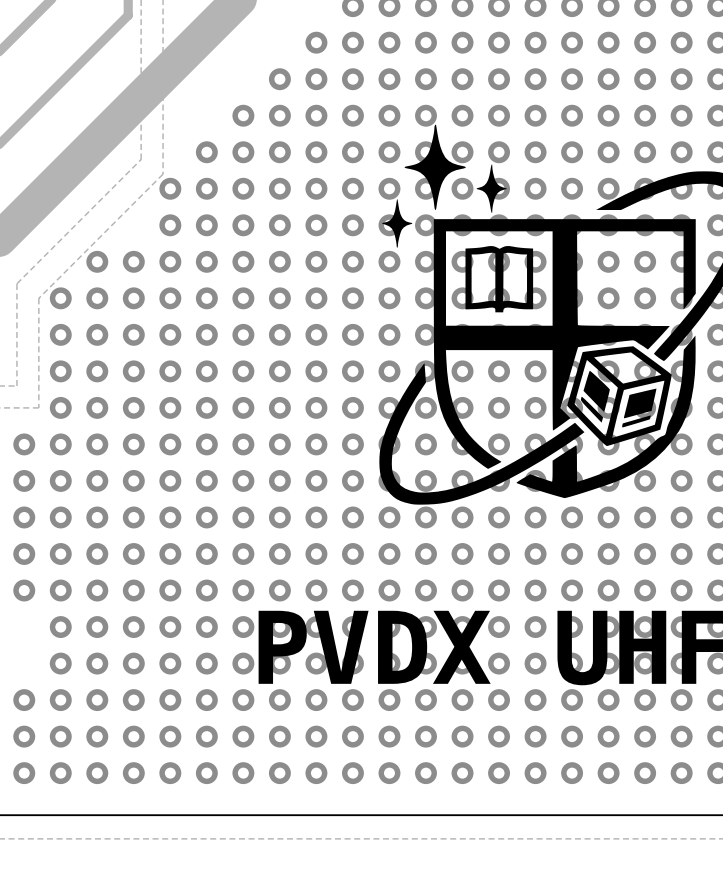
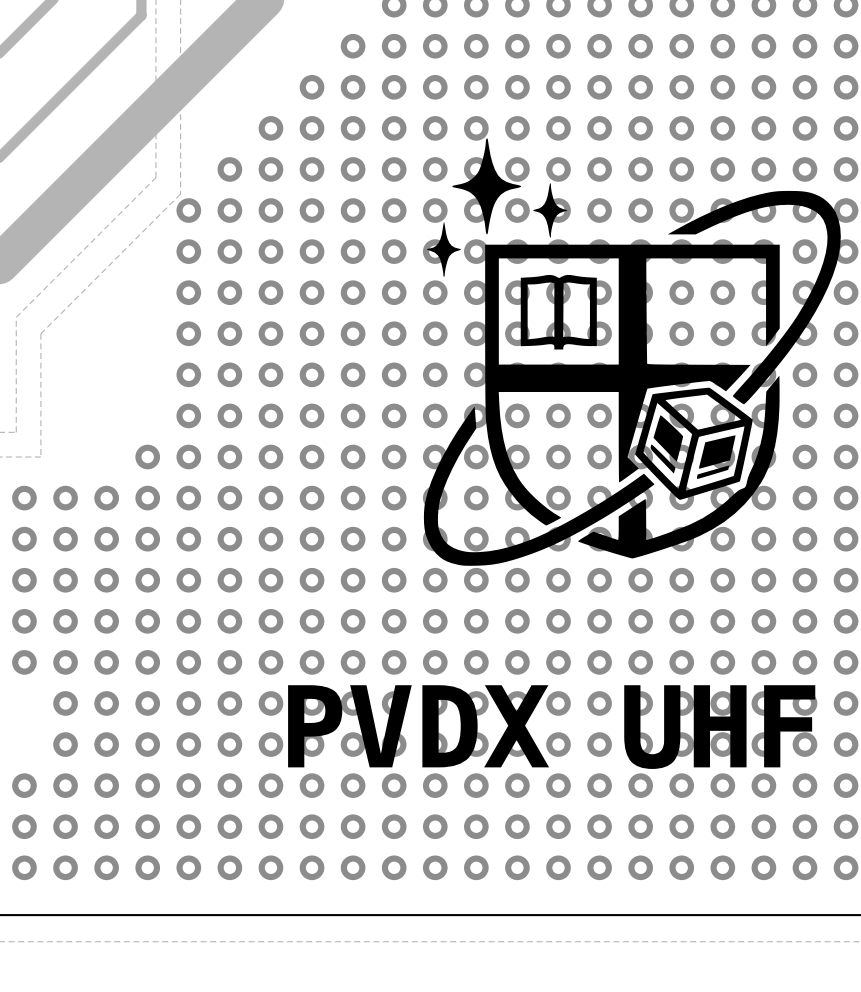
via: (97, 261) -> none
via: (133, 261) -> none
via: (60, 298) -> none
via: (97, 298) -> none
via: (133, 298) -> none
via: (60, 334) -> none
via: (97, 334) -> none
via: (133, 334) -> none
via: (60, 371) -> none
via: (97, 371) -> none
via: (133, 371) -> none
via: (60, 407) -> none
via: (97, 407) -> none

